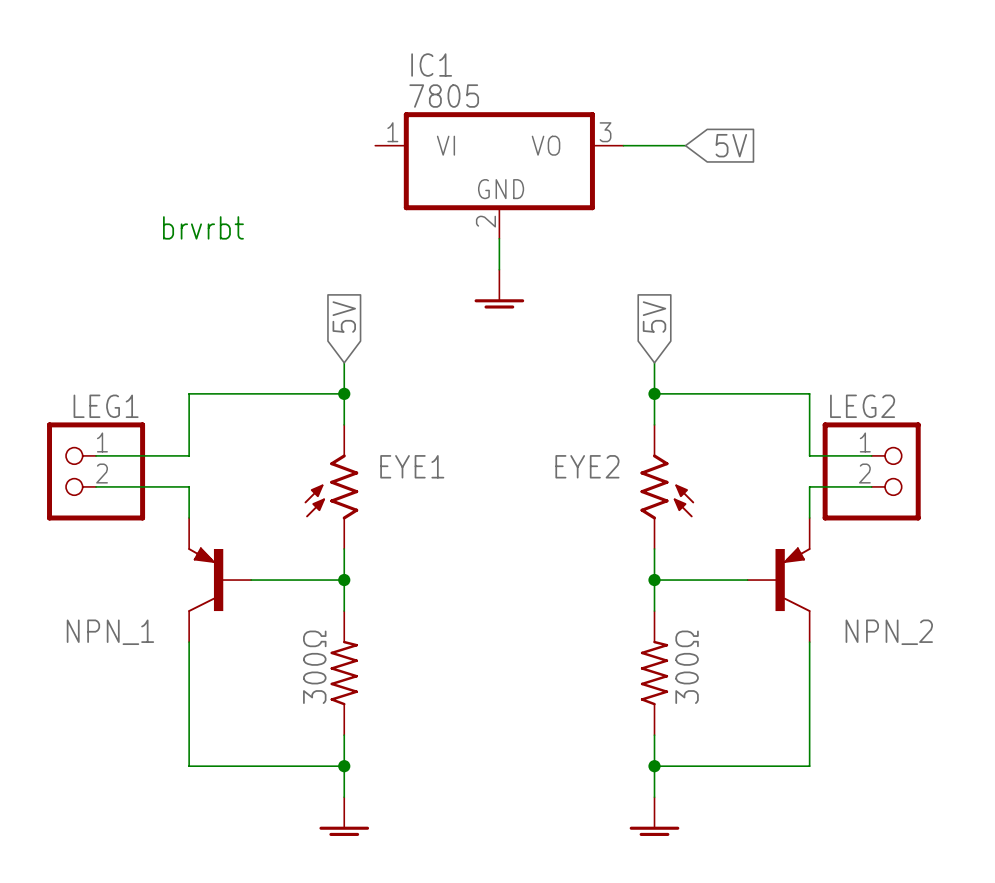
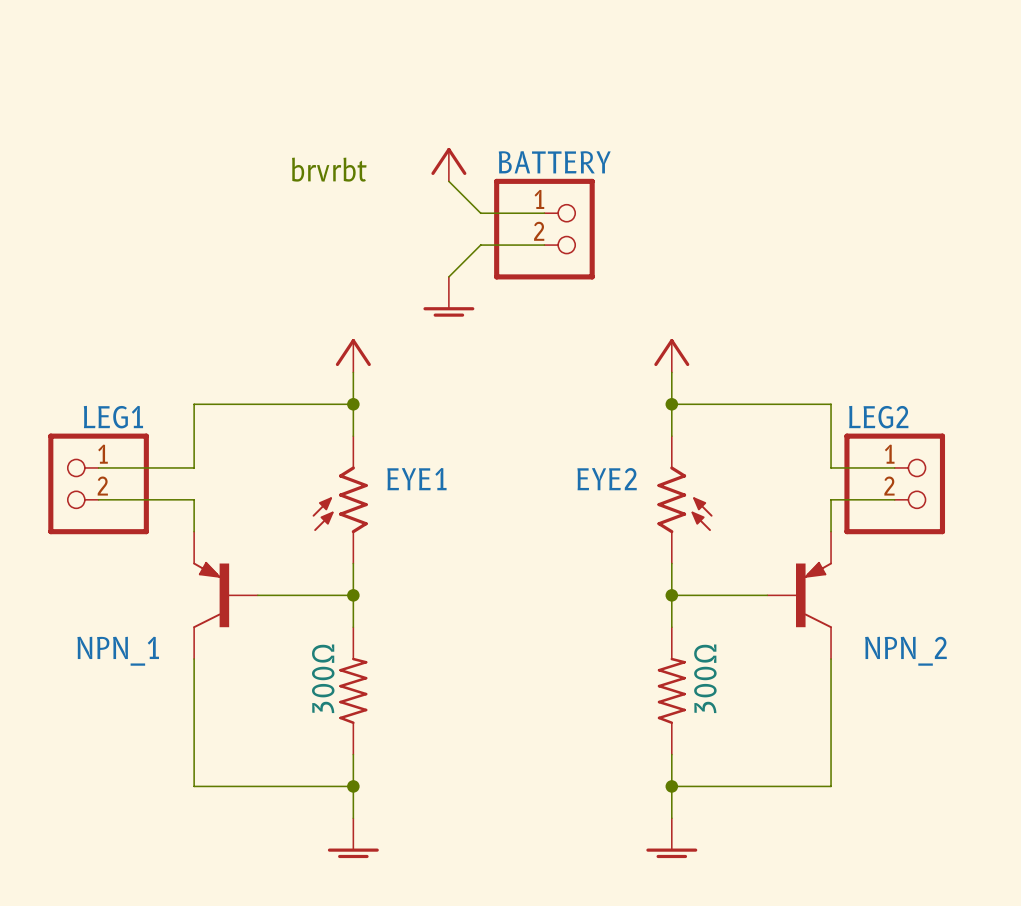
wire: (623, 145) (685, 145) -> none
global label: 5V (731, 145) -> none
power symbol: none -> (448, 164)
IC1: 7805 (499, 175) -> none
wire: none -> (448, 181) (480, 213) (544, 213)
BATTERY: none -> (544, 229)
text position: brvrbt (203, 227) -> brvrbt (329, 169)
wire: (499, 238) (499, 269) -> none
wire: none -> (544, 245) (480, 245) (448, 276)
power symbol position: (499, 289) -> (448, 296)
global label: 5V (344, 317) -> none
global label: 5V (654, 317) -> none
power symbol: none -> (353, 355)
power symbol: none -> (671, 355)

